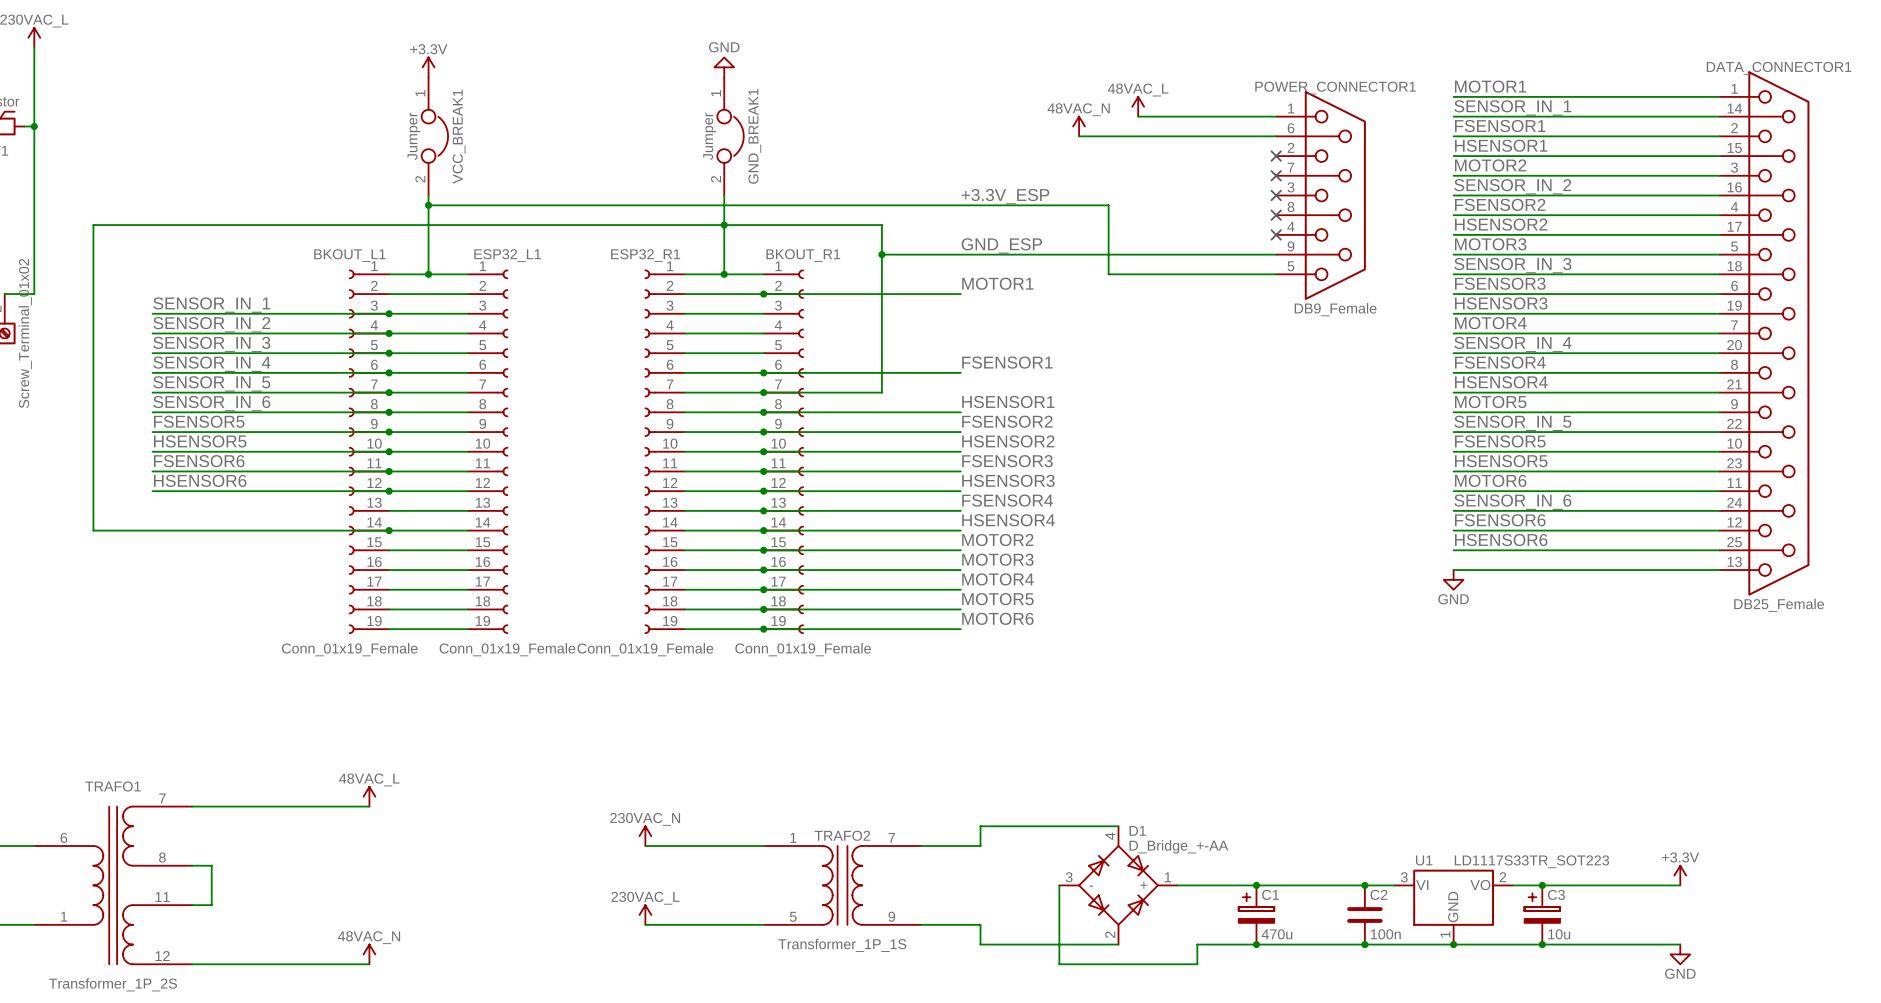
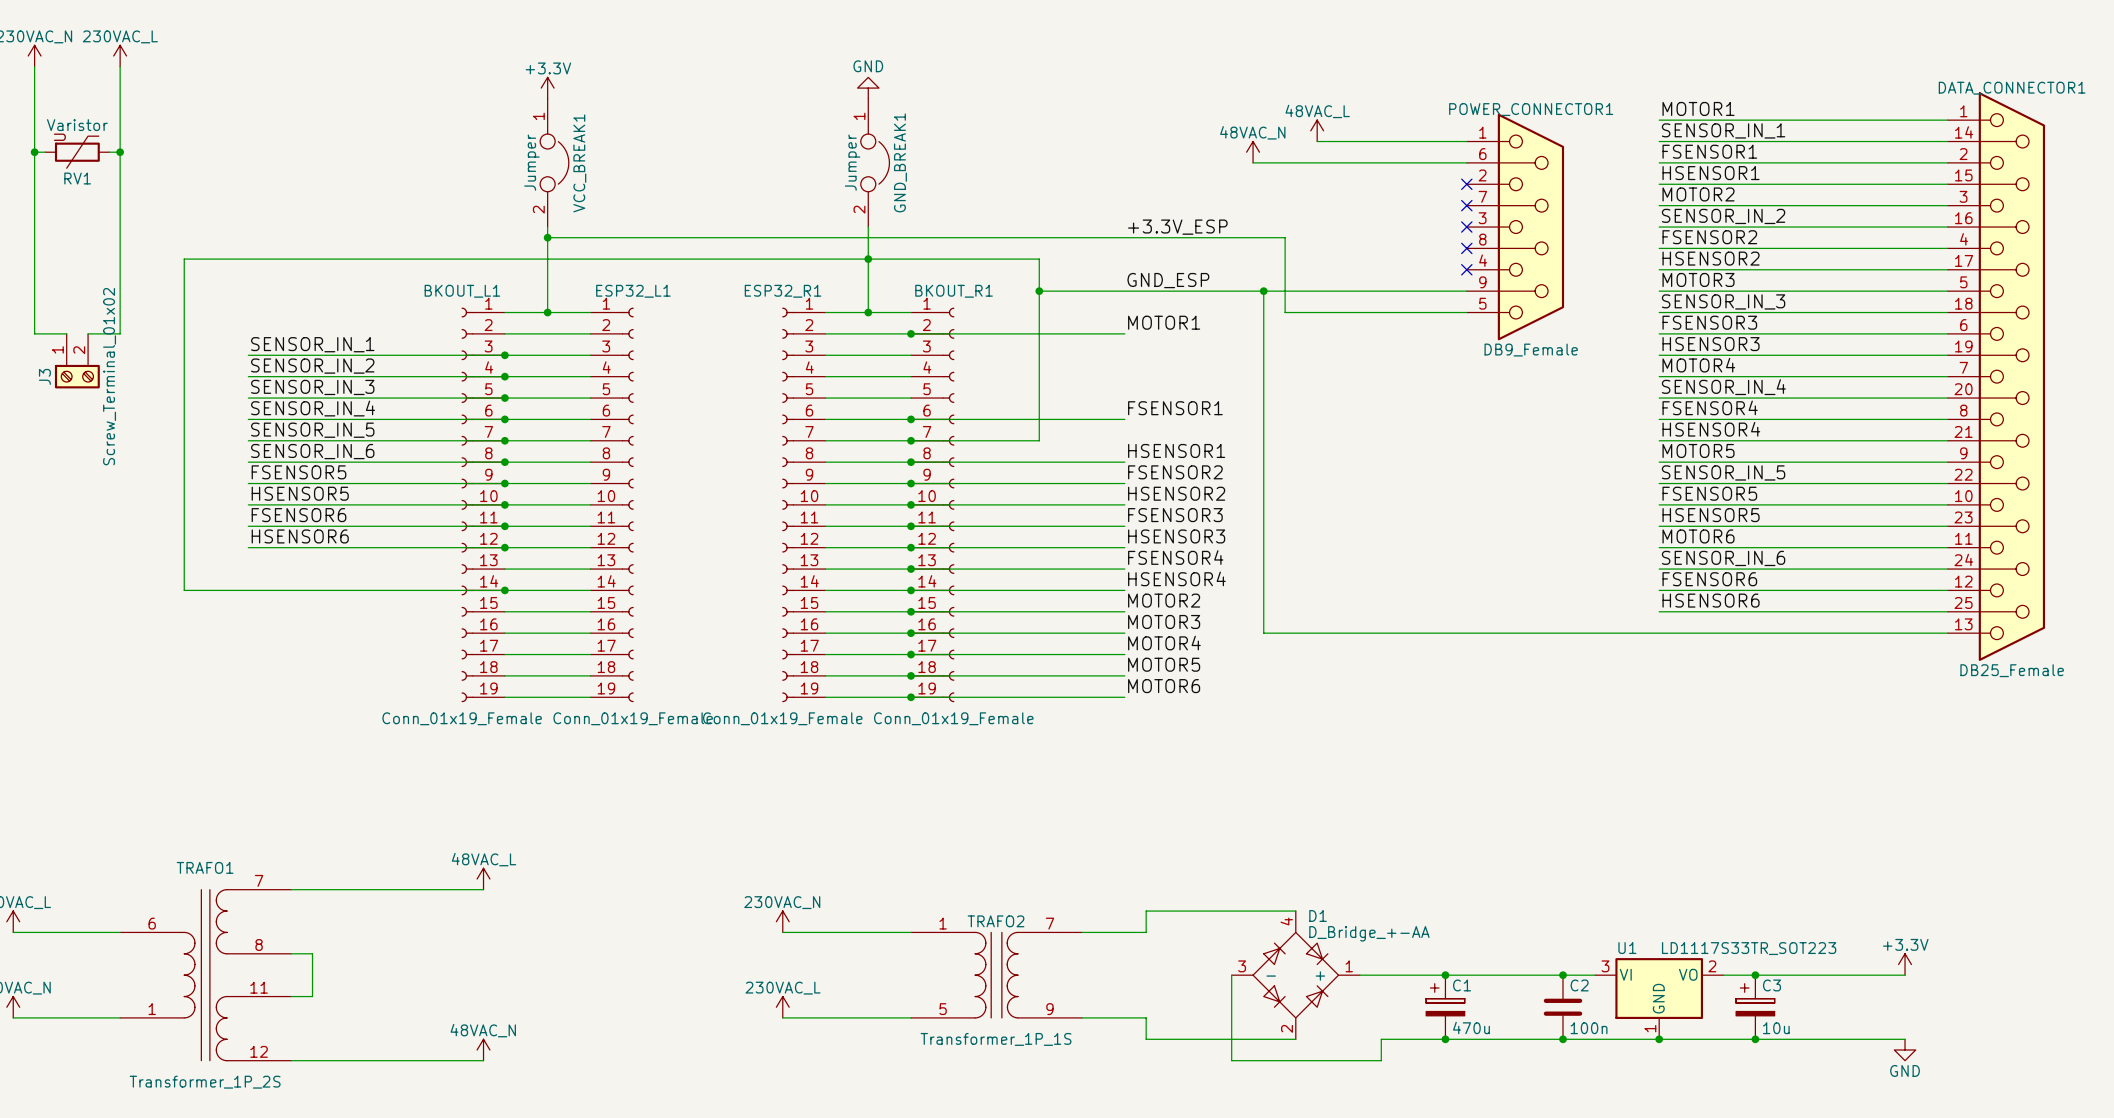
wire: none -> (1263, 291) (1263, 633) (1659, 633)
junction: none -> (1263, 291)
power symbol: GND (1453, 579) -> none

